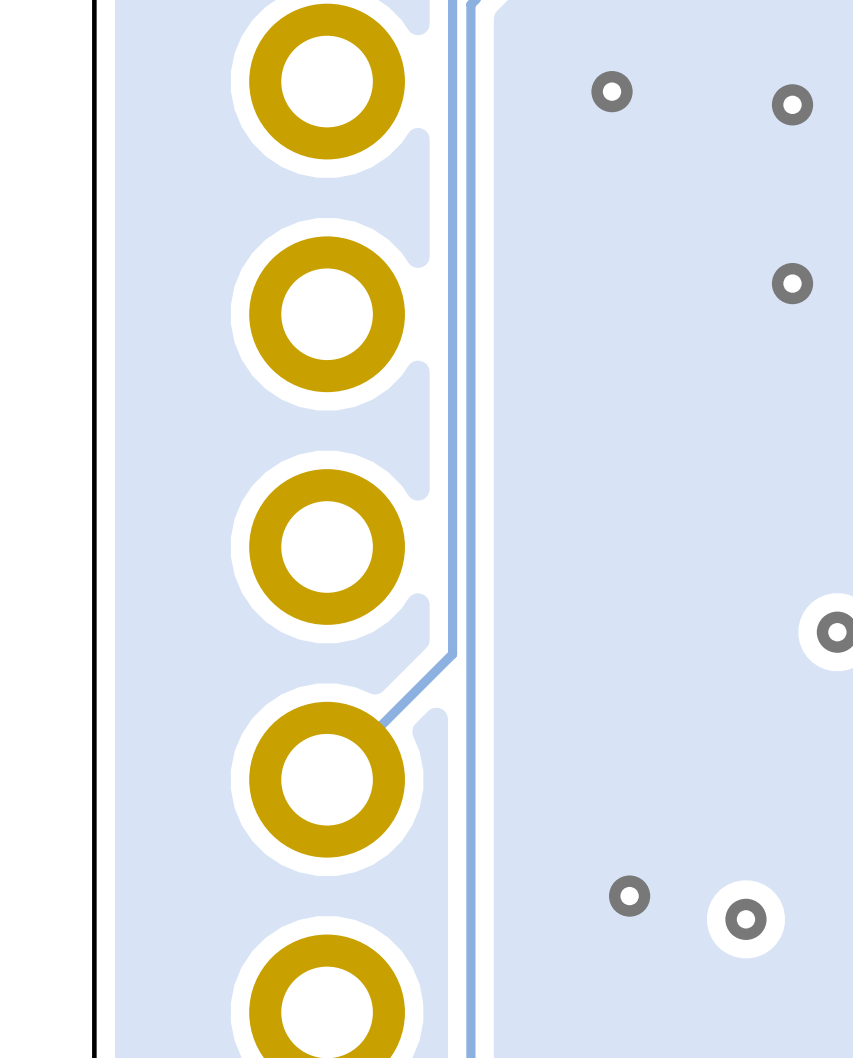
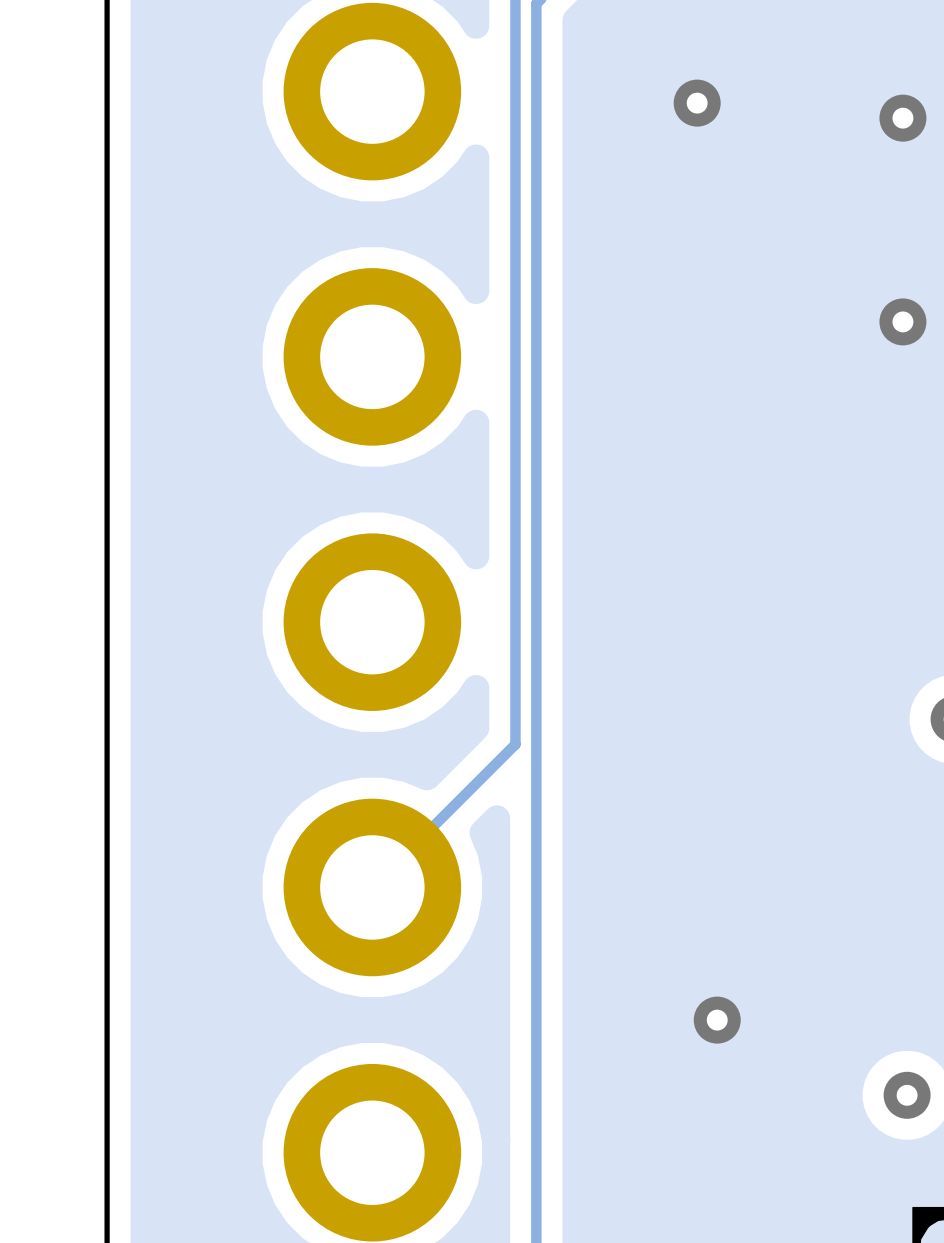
via position: (745, 919) -> (907, 1095)

